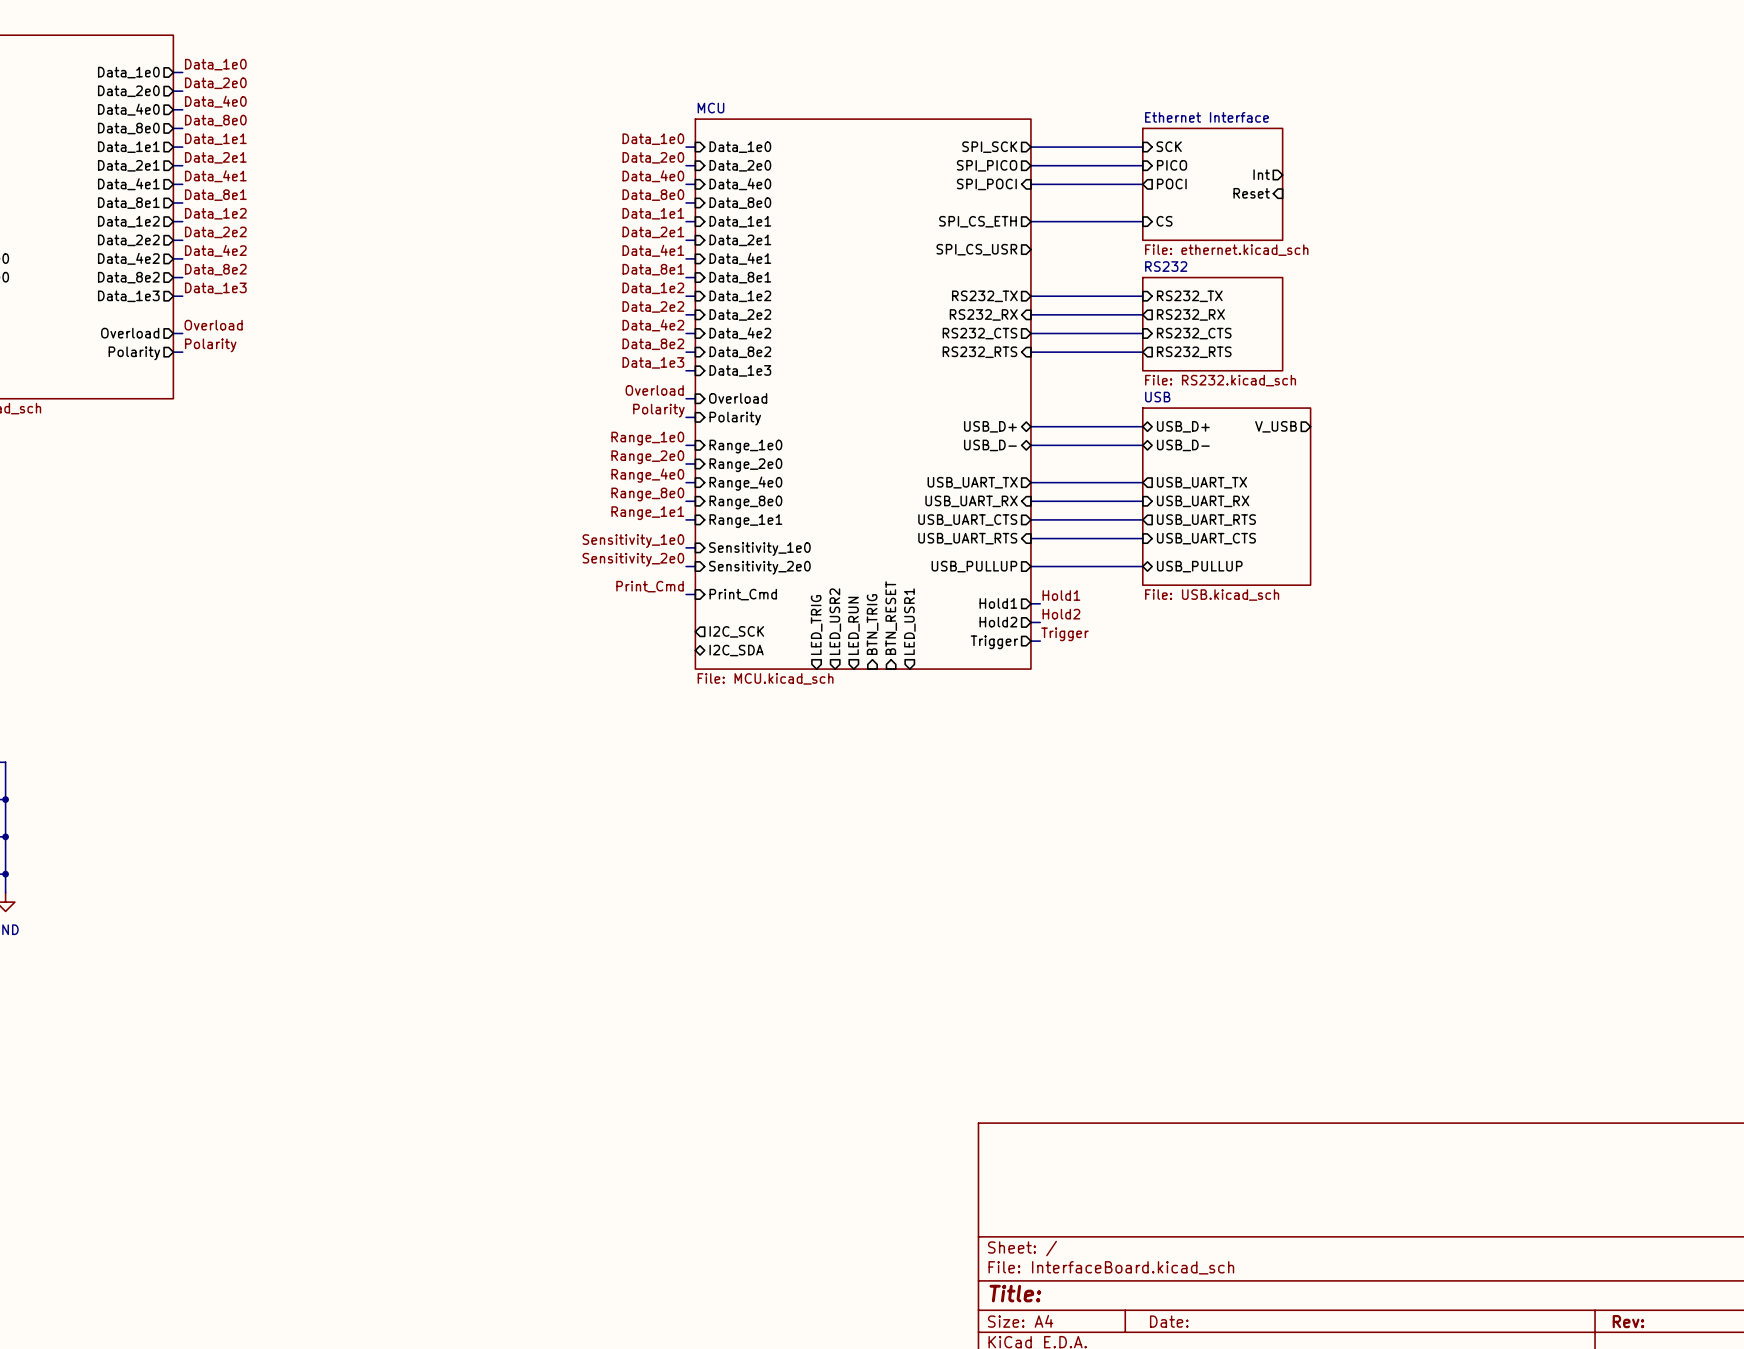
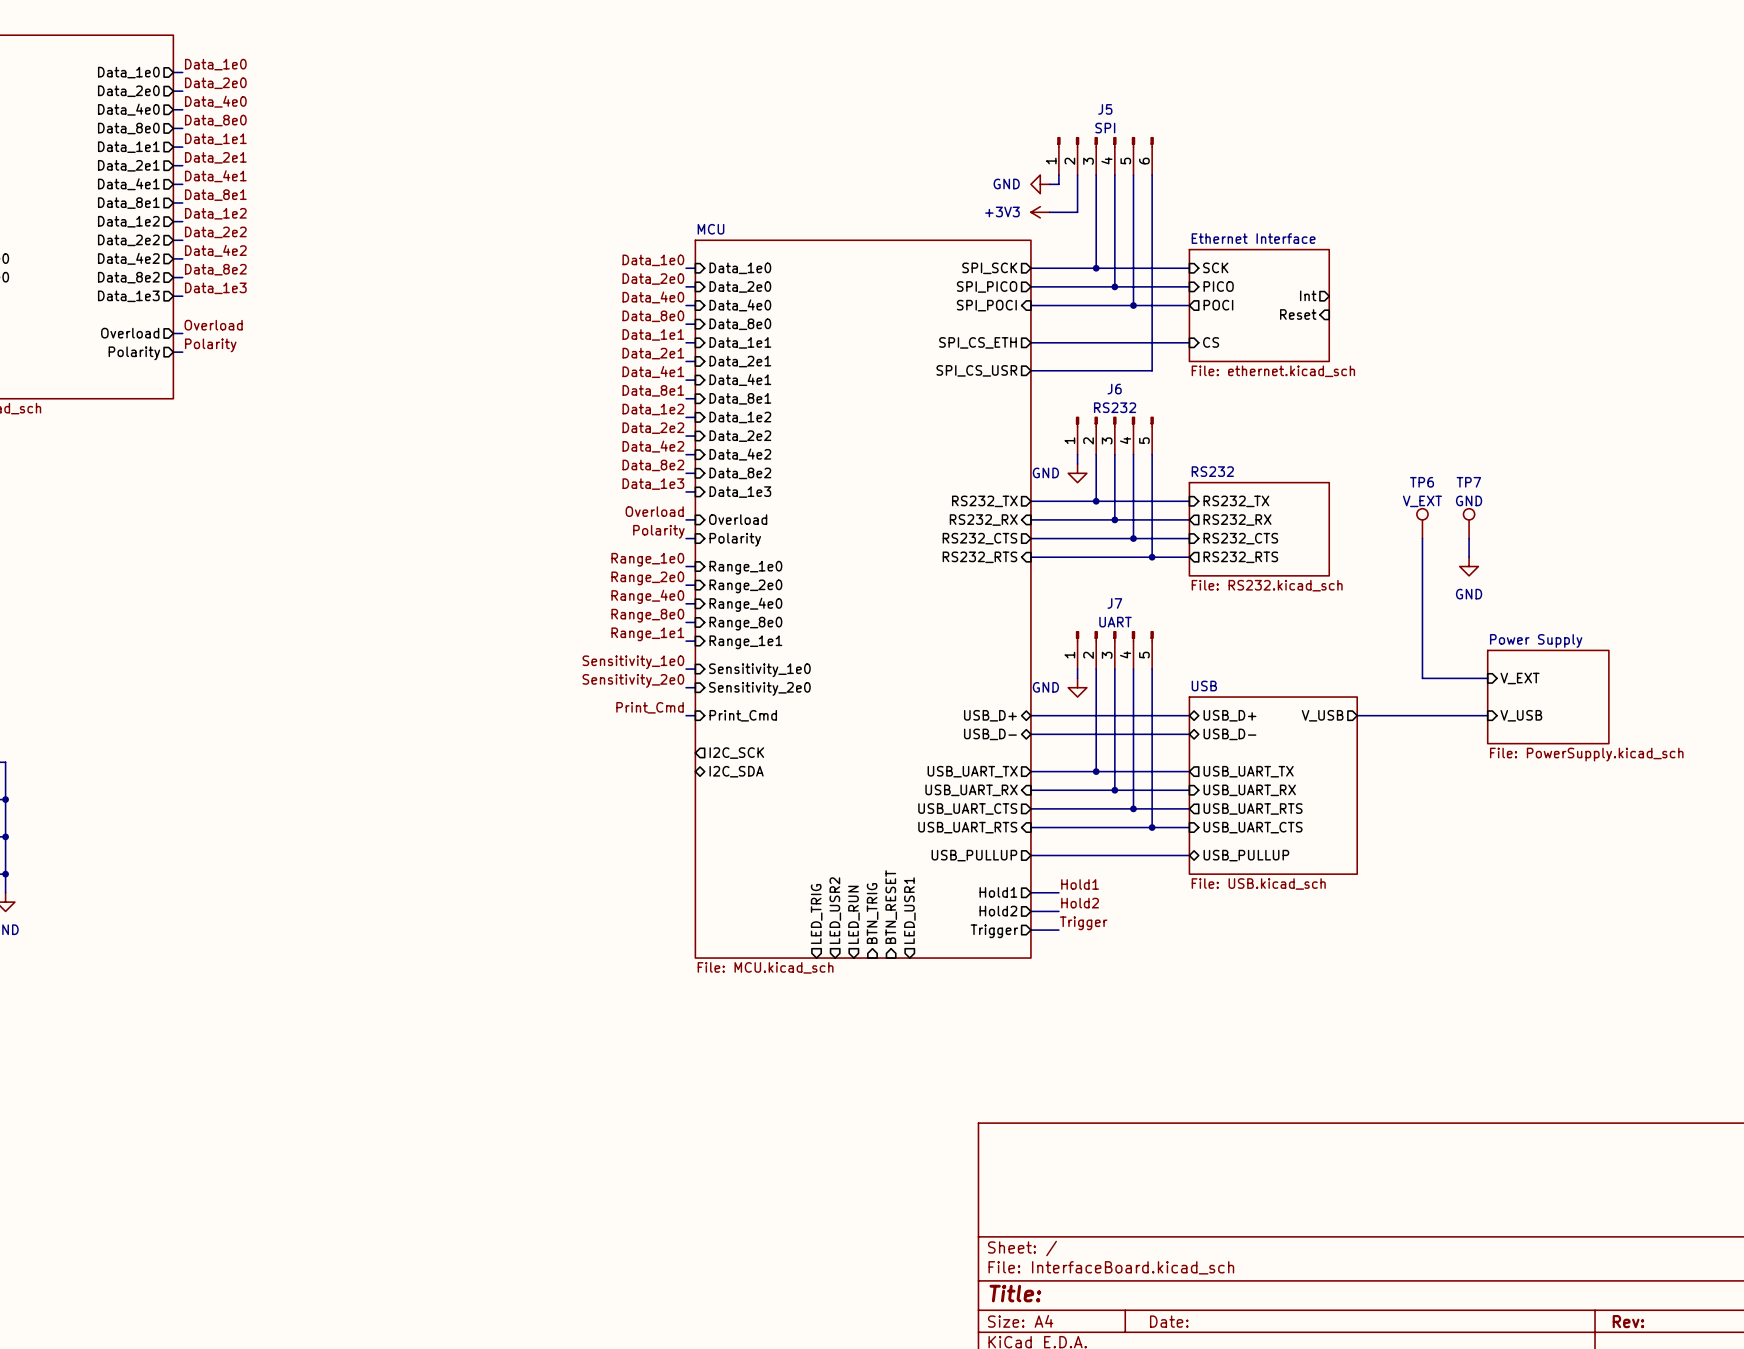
label position: Data_1e0 (653, 139) -> Data_1e0 (653, 260)
sheet pin position: SCK (1169, 146) -> SCK (1215, 267)
wire: (686, 147) (695, 147) -> (686, 268) (695, 268)
sheet pin position: Data_1e0 (740, 147) -> Data_1e0 (740, 268)
sheet pin position: SPI_SCK (989, 147) -> SPI_SCK (989, 268)
wire: (1030, 147) (1142, 147) -> none
J5: none -> SPI (1105, 156)
label position: Data_2e0 (653, 157) -> Data_2e0 (653, 279)
wire: (686, 165) (695, 165) -> (686, 286) (695, 286)
sheet pin position: Data_2e0 (740, 165) -> Data_2e0 (740, 286)
sheet pin position: SPI_PICO (987, 165) -> SPI_PICO (987, 286)
wire: (1030, 165) (1142, 165) -> none
sheet pin position: PICO (1172, 165) -> PICO (1218, 286)
sheet pin position: Int (1261, 174) -> Int (1308, 295)
wire: none -> (1077, 175) (1077, 212) (1049, 212)
wire: none -> (1096, 175) (1096, 268)
wire: none -> (1114, 175) (1114, 286)
wire: none -> (1133, 175) (1133, 305)
wire: none -> (1152, 175) (1152, 370) (1030, 370)
label position: Data_4e0 (653, 176) -> Data_4e0 (653, 297)
wire: (686, 184) (695, 184) -> (686, 305) (695, 305)
sheet pin position: Data_4e0 (740, 184) -> Data_4e0 (740, 305)
sheet pin position: SPI_POCI (986, 184) -> SPI_POCI (986, 305)
power symbol: none -> GND (1040, 184)
wire: (1058, 184) (1142, 184) -> (1058, 184) (1058, 175)
sheet pin position: POCI (1171, 184) -> POCI (1218, 305)
sheet Ethernet Interface position: (1212, 184) -> (1259, 305)
sheet pin position: Reset (1251, 193) -> Reset (1298, 314)
label position: Data_8e0 (653, 195) -> Data_8e0 (653, 316)
wire: (686, 202) (695, 202) -> (686, 324) (695, 324)
sheet pin position: Data_8e0 (740, 203) -> Data_8e0 (740, 324)
power symbol: none -> +3V3 (1040, 212)
label position: Data_1e1 (653, 213) -> Data_1e1 (653, 334)
wire: (686, 221) (695, 221) -> (686, 342) (695, 342)
sheet pin position: Data_1e1 (740, 221) -> Data_1e1 (740, 342)
sheet pin position: SPI_CS_ETH (977, 221) -> SPI_CS_ETH (977, 342)
wire: (1030, 221) (1142, 221) -> none
sheet pin position: CS (1164, 221) -> CS (1211, 342)
label position: Data_2e1 (653, 232) -> Data_2e1 (653, 353)
wire: (686, 240) (695, 240) -> (686, 361) (695, 361)
sheet pin position: Data_2e1 (740, 240) -> Data_2e1 (740, 361)
sheet pin position: SPI_CS_USR (976, 249) -> SPI_CS_USR (976, 370)
label position: Data_4e1 (653, 250) -> Data_4e1 (653, 372)
wire: (686, 258) (695, 258) -> (686, 380) (695, 380)
sheet pin position: Data_4e1 (740, 258) -> Data_4e1 (740, 379)
wire: none -> (1030, 268) (1189, 268)
junction: none -> (1096, 268)
label: Data_8e1 (653, 269) -> none
wire: (686, 277) (695, 277) -> none
sheet pin: Data_8e1 (740, 277) -> none
wire: none -> (1030, 286) (1189, 286)
junction: none -> (1114, 286)
label: Data_1e2 (653, 288) -> none
wire: (686, 296) (695, 296) -> none
sheet pin: Data_1e2 (740, 296) -> none
sheet pin: RS232_TX (984, 296) -> none
wire: (1030, 296) (1142, 296) -> none
sheet pin: RS232_TX (1189, 296) -> none
wire: none -> (1030, 305) (1189, 305)
junction: none -> (1133, 305)
label position: Data_2e2 (653, 306) -> Data_2e2 (653, 428)
wire: (686, 314) (695, 314) -> (686, 436) (695, 436)
sheet pin position: Data_2e2 (740, 314) -> Data_2e2 (740, 436)
sheet pin: RS232_RX (983, 314) -> none
wire: (1030, 314) (1142, 314) -> none
sheet pin: RS232_RX (1190, 314) -> none
sheet RS232 position: (1212, 324) -> (1259, 529)
label position: Data_4e2 (653, 325) -> Data_4e2 (653, 446)
wire: (686, 333) (695, 333) -> (686, 454) (695, 454)
sheet pin position: Data_4e2 (740, 333) -> Data_4e2 (740, 454)
sheet pin: RS232_CTS (979, 333) -> none
wire: (1030, 333) (1142, 333) -> none
sheet pin: RS232_CTS (1194, 333) -> none
wire: none -> (1030, 342) (1189, 342)
label position: Data_8e2 (653, 344) -> Data_8e2 (653, 465)
wire: (686, 352) (695, 352) -> (686, 473) (695, 473)
sheet pin position: Data_8e2 (740, 352) -> Data_8e2 (740, 473)
sheet pin: RS232_RTS (979, 352) -> none
wire: (1030, 352) (1142, 352) -> none
sheet pin: RS232_RTS (1194, 352) -> none
label position: Data_1e3 (653, 362) -> Data_1e3 (653, 484)
wire: (686, 370) (695, 370) -> (686, 491) (695, 491)
sheet pin position: Data_1e3 (740, 370) -> Data_1e3 (740, 492)
label: Overload (654, 390) -> Data_8e1 (653, 390)
sheet MCU: File: MCU.kicad_sch (863, 394) -> none
sheet pin: Overload (738, 398) -> Data_8e1 (740, 398)
label: Polarity (658, 410) -> Data_1e2 (653, 409)
sheet pin: Polarity (735, 418) -> Data_1e2 (740, 417)
sheet pin: USB_D+ (990, 426) -> none
wire: (1030, 426) (1142, 426) -> none
sheet pin: USB_D+ (1183, 426) -> none
sheet pin: V_USB (1276, 426) -> none
J6: none -> RS232 (1114, 435)
label: Range_1e0 (647, 438) -> none
wire: (686, 445) (695, 445) -> (686, 538) (695, 538)
sheet pin: USB_D- (990, 445) -> none
wire: (1030, 445) (1142, 445) -> none
sheet pin: USB_D- (1183, 445) -> none
sheet pin: Range_1e0 (745, 446) -> none
wire: none -> (1077, 454) (1077, 463)
wire: none -> (1096, 454) (1096, 501)
wire: none -> (1114, 454) (1114, 519)
wire: none -> (1133, 454) (1133, 538)
wire: none -> (1152, 454) (1152, 557)
label position: Range_2e0 (647, 457) -> Range_2e0 (647, 578)
wire: (686, 463) (695, 463) -> (686, 585) (695, 585)
sheet pin position: Range_2e0 (745, 465) -> Range_2e0 (745, 586)
power symbol: none -> GND (1077, 473)
label position: Range_4e0 (647, 475) -> Range_4e0 (647, 596)
wire: (686, 482) (695, 482) -> (686, 603) (695, 603)
sheet pin: USB_UART_TX (972, 482) -> none
wire: (1030, 482) (1142, 482) -> none
sheet pin: USB_UART_TX (1201, 482) -> none
sheet pin position: Range_4e0 (745, 483) -> Range_4e0 (745, 604)
label position: Range_8e0 (647, 494) -> Range_8e0 (647, 615)
sheet USB: File: USB.kicad_sch (1226, 496) -> none
wire: (686, 501) (695, 501) -> (686, 622) (695, 622)
sheet pin shape: input (971, 501) -> output (984, 501)
sheet pin: USB_UART_RX (971, 501) -> RS232_TX (984, 501)
junction: none -> (1096, 501)
wire: none -> (1142, 501) (1189, 501)
sheet pin: USB_UART_RX (1203, 501) -> none
sheet pin: none -> RS232_TX (1236, 501)
sheet pin position: Range_8e0 (745, 502) -> Range_8e0 (745, 623)
label: Range_1e1 (647, 513) -> Overload (654, 511)
junction: none -> (1114, 519)
wire: none -> (1142, 519) (1189, 519)
sheet pin shape: output (967, 520) -> input (983, 520)
sheet pin: USB_UART_CTS (967, 520) -> RS232_RX (983, 520)
sheet pin: USB_UART_RTS (1206, 520) -> none
sheet pin: none -> RS232_RX (1237, 520)
sheet pin: Range_1e1 (745, 521) -> Overload (738, 519)
TP6: none -> V_EXT (1422, 523)
TP7: none -> GND (1469, 523)
label: none -> Polarity (658, 531)
sheet pin shape: input (967, 538) -> output (979, 538)
sheet pin: USB_UART_RTS (967, 538) -> RS232_CTS (979, 538)
junction: none -> (1133, 538)
wire: none -> (1142, 538) (1189, 538)
sheet pin: USB_UART_CTS (1206, 538) -> none
sheet pin: none -> RS232_CTS (1240, 538)
wire: none -> (1422, 538) (1422, 678) (1487, 678)
wire: none -> (1469, 538) (1469, 557)
sheet pin: none -> Polarity (735, 539)
label position: Sensitivity_1e0 (633, 541) -> Sensitivity_1e0 (633, 662)
wire: (686, 547) (695, 547) -> (686, 669) (695, 669)
sheet pin position: Sensitivity_1e0 (759, 549) -> Sensitivity_1e0 (759, 670)
sheet pin: none -> RS232_RTS (979, 557)
wire: none -> (1030, 557) (1189, 557)
junction: none -> (1152, 557)
sheet pin: none -> RS232_RTS (1240, 557)
label: Sensitivity_2e0 (633, 559) -> Range_1e0 (647, 559)
sheet pin: USB_PULLUP (974, 566) -> none
wire: (1030, 566) (1142, 566) -> none
sheet pin: USB_PULLUP (1199, 566) -> none
power symbol: none -> GND (1469, 566)
sheet pin: Sensitivity_2e0 (759, 567) -> Range_1e0 (745, 567)
label position: Print_Cmd (650, 586) -> Print_Cmd (650, 707)
wire: (686, 594) (695, 594) -> (686, 715) (695, 715)
sheet pin position: Print_Cmd (743, 594) -> Print_Cmd (743, 715)
label: Hold1 (1061, 595) -> none
sheet MCU: none -> File: MCU.kicad_sch (863, 599)
sheet pin: Hold1 (998, 603) -> none
wire: (1030, 603) (1040, 603) -> none
label: Hold2 (1061, 614) -> none
sheet pin: BTN_RESET (891, 618) -> none
sheet pin: LED_USR2 (835, 621) -> none
sheet pin: LED_USR1 (909, 621) -> none
sheet pin: Hold2 (998, 622) -> none
wire: (1030, 622) (1040, 622) -> none
sheet pin: LED_TRIG (816, 624) -> none
sheet pin: BTN_TRIG (872, 624) -> none
sheet pin: LED_RUN (853, 625) -> none
sheet pin position: I2C_SCK (736, 631) -> I2C_SCK (736, 753)
label: none -> Range_1e1 (647, 634)
label: Trigger (1064, 634) -> none
wire: none -> (686, 641) (695, 641)
wire: (1030, 641) (1040, 641) -> none
sheet pin: none -> Range_1e1 (745, 642)
sheet pin: Trigger (994, 642) -> none
sheet pin position: I2C_SDA (736, 650) -> I2C_SDA (736, 771)
J7: none -> UART (1114, 650)
wire: none -> (1077, 669) (1077, 678)
wire: none -> (1096, 669) (1096, 771)
wire: none -> (1114, 669) (1114, 790)
wire: none -> (1133, 669) (1133, 808)
wire: none -> (1152, 669) (1152, 827)
sheet pin: none -> V_EXT (1520, 678)
label: none -> Sensitivity_2e0 (633, 680)
wire: none -> (686, 687) (695, 687)
power symbol: none -> GND (1077, 687)
sheet pin: none -> Sensitivity_2e0 (759, 688)
sheet Power Supply: none -> File: PowerSupply.kicad_sch (1548, 697)
sheet pin: none -> USB_D+ (990, 715)
wire: none -> (1030, 715) (1189, 715)
sheet pin: none -> USB_D+ (1229, 715)
sheet pin: none -> V_USB (1322, 715)
wire: none -> (1357, 715) (1487, 715)
sheet pin: none -> V_USB (1521, 715)
sheet pin: none -> USB_D- (990, 734)
wire: none -> (1030, 734) (1189, 734)
sheet pin: none -> USB_D- (1229, 734)
sheet pin: none -> USB_UART_TX (972, 771)
wire: none -> (1030, 771) (1189, 771)
junction: none -> (1096, 771)
sheet pin: none -> USB_UART_TX (1248, 771)
sheet USB: none -> File: USB.kicad_sch (1273, 785)
sheet pin: none -> USB_UART_RX (971, 790)
wire: none -> (1030, 790) (1189, 790)
junction: none -> (1114, 790)
sheet pin: none -> USB_UART_RX (1249, 790)
sheet pin: none -> USB_UART_CTS (967, 808)
wire: none -> (1030, 808) (1189, 808)
junction: none -> (1133, 808)
sheet pin: none -> USB_UART_RTS (1253, 808)
sheet pin: none -> USB_UART_RTS (967, 827)
wire: none -> (1030, 827) (1189, 827)
junction: none -> (1152, 827)
sheet pin: none -> USB_UART_CTS (1253, 827)
sheet pin: none -> USB_PULLUP (974, 855)
wire: none -> (1030, 855) (1189, 855)
sheet pin: none -> USB_PULLUP (1246, 855)
label: none -> Hold1 (1080, 884)
sheet pin: none -> Hold1 (998, 892)
wire: none -> (1030, 892) (1058, 892)
label: none -> Hold2 (1080, 903)
sheet pin: none -> BTN_RESET (891, 907)
sheet pin: none -> LED_USR2 (835, 910)
sheet pin: none -> LED_USR1 (909, 910)
sheet pin: none -> Hold2 (998, 911)
wire: none -> (1030, 911) (1058, 911)
sheet pin: none -> LED_TRIG (816, 913)
sheet pin: none -> BTN_TRIG (872, 913)
sheet pin: none -> LED_RUN (853, 914)
label: none -> Trigger (1083, 923)
wire: none -> (1030, 930) (1058, 930)
sheet pin: none -> Trigger (994, 931)

